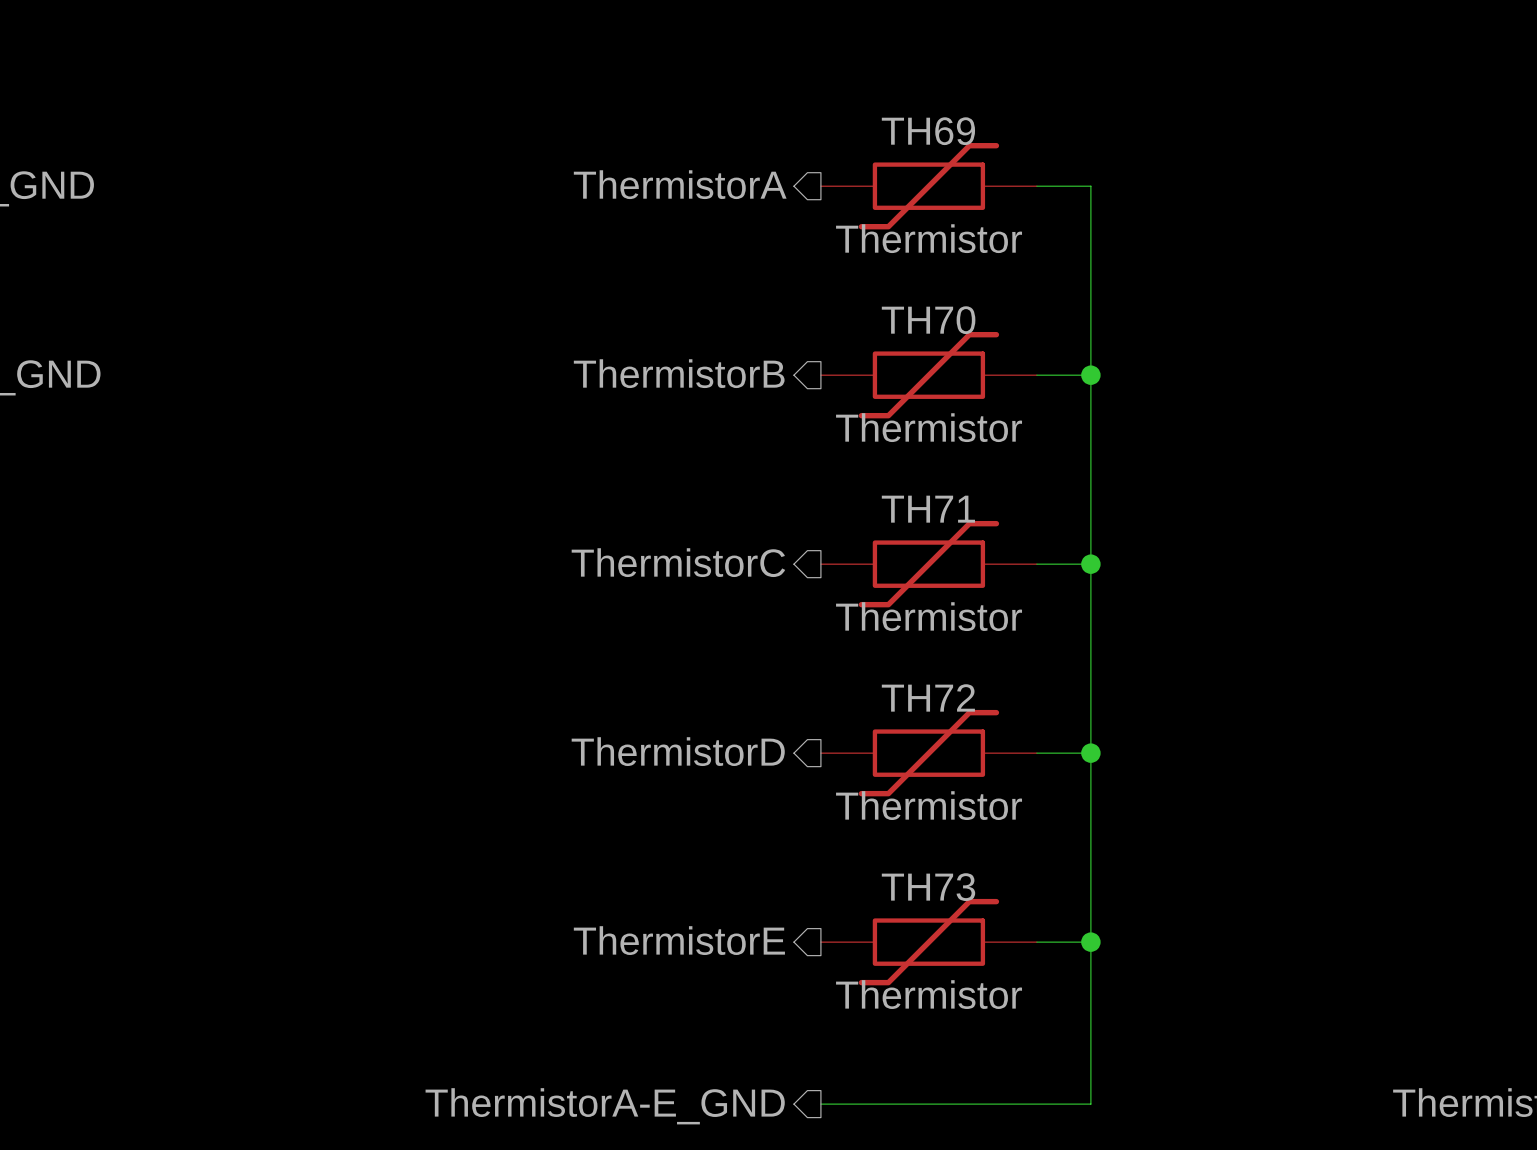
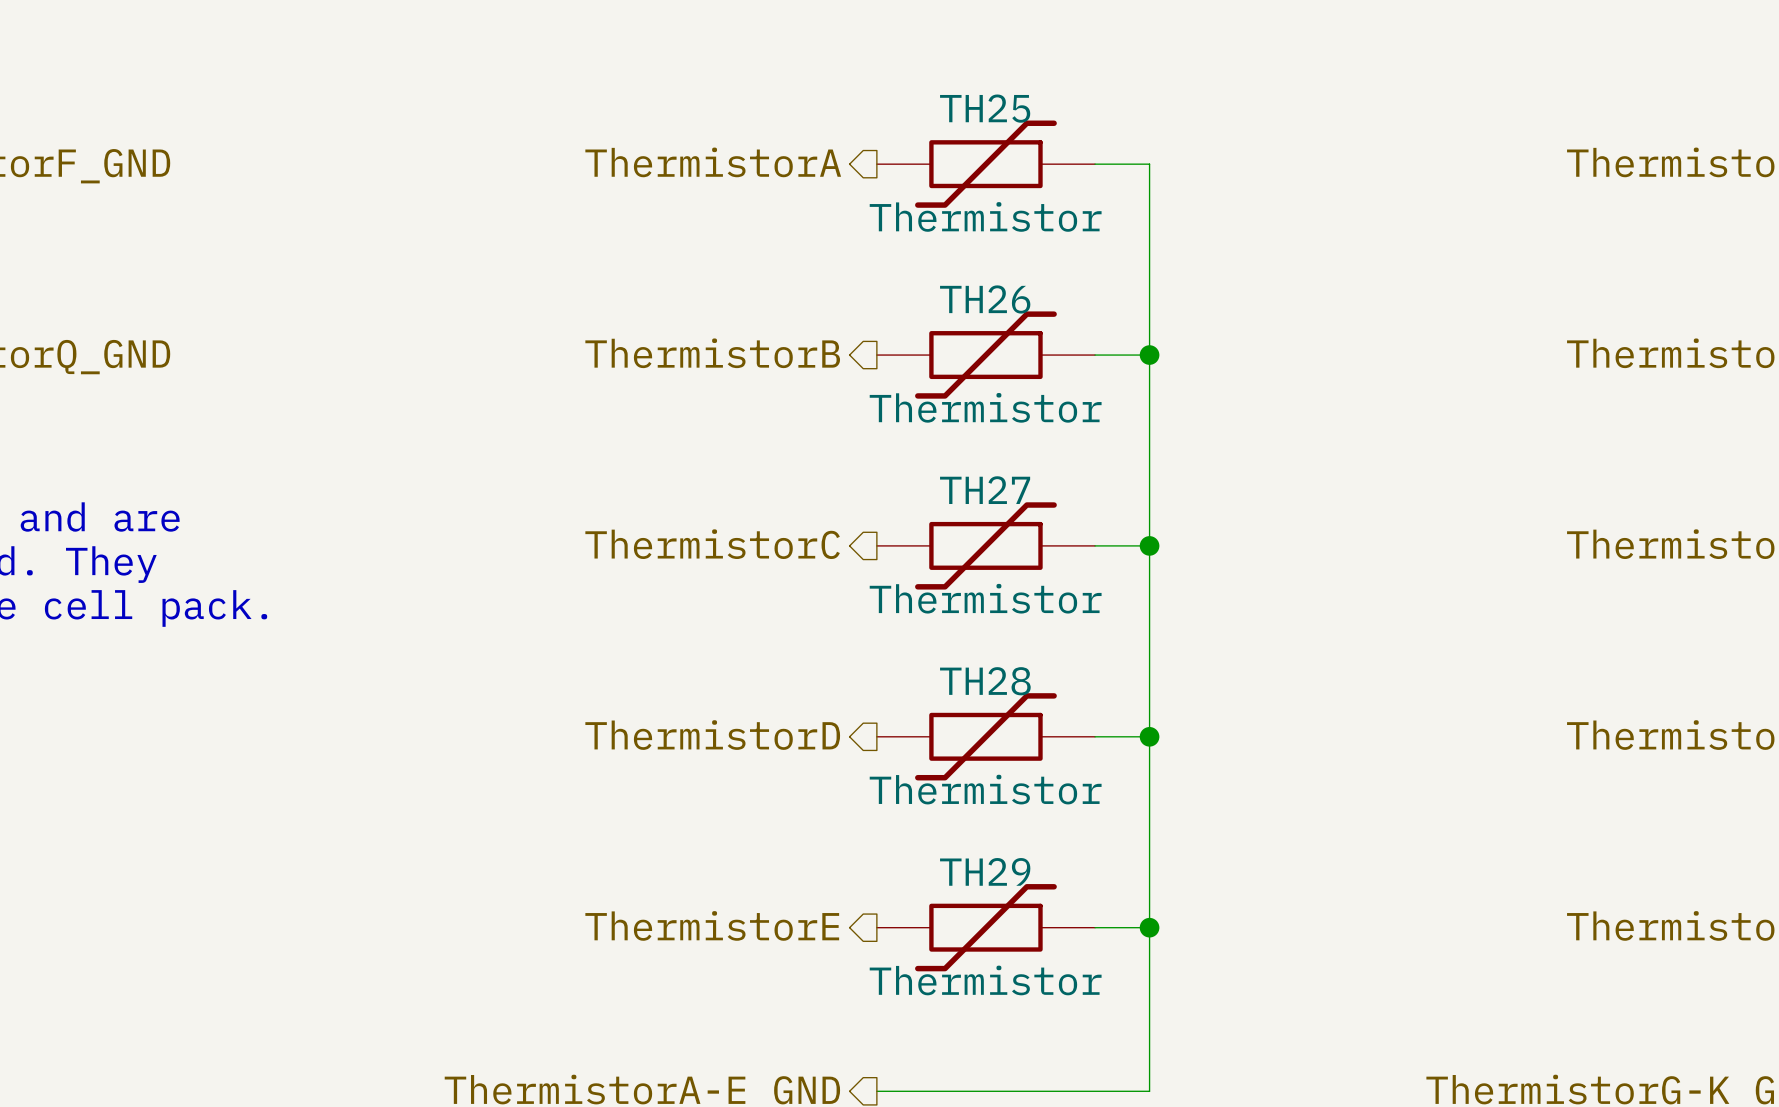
TH69 name: TH69 (928, 131) -> TH25 (985, 108)
TH70 name: TH70 (928, 320) -> TH26 (985, 299)
TH71 name: TH71 (928, 509) -> TH27 (985, 490)
TH72 name: TH72 (928, 697) -> TH28 (985, 681)
TH73 name: TH73 (928, 887) -> TH29 (985, 871)

